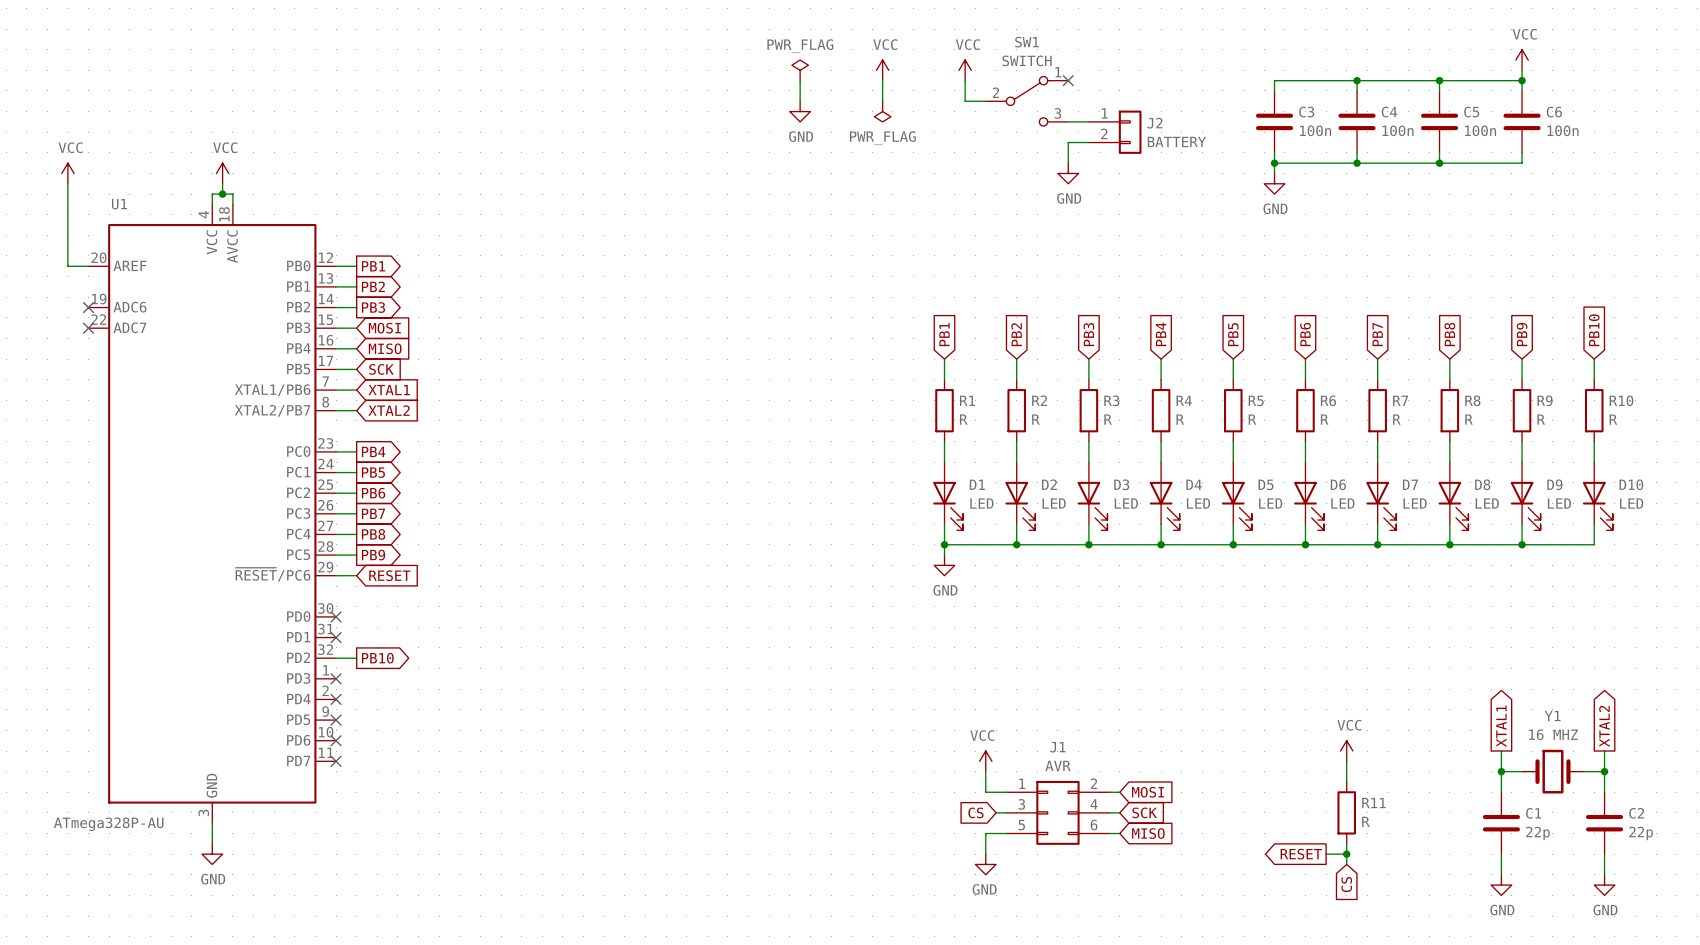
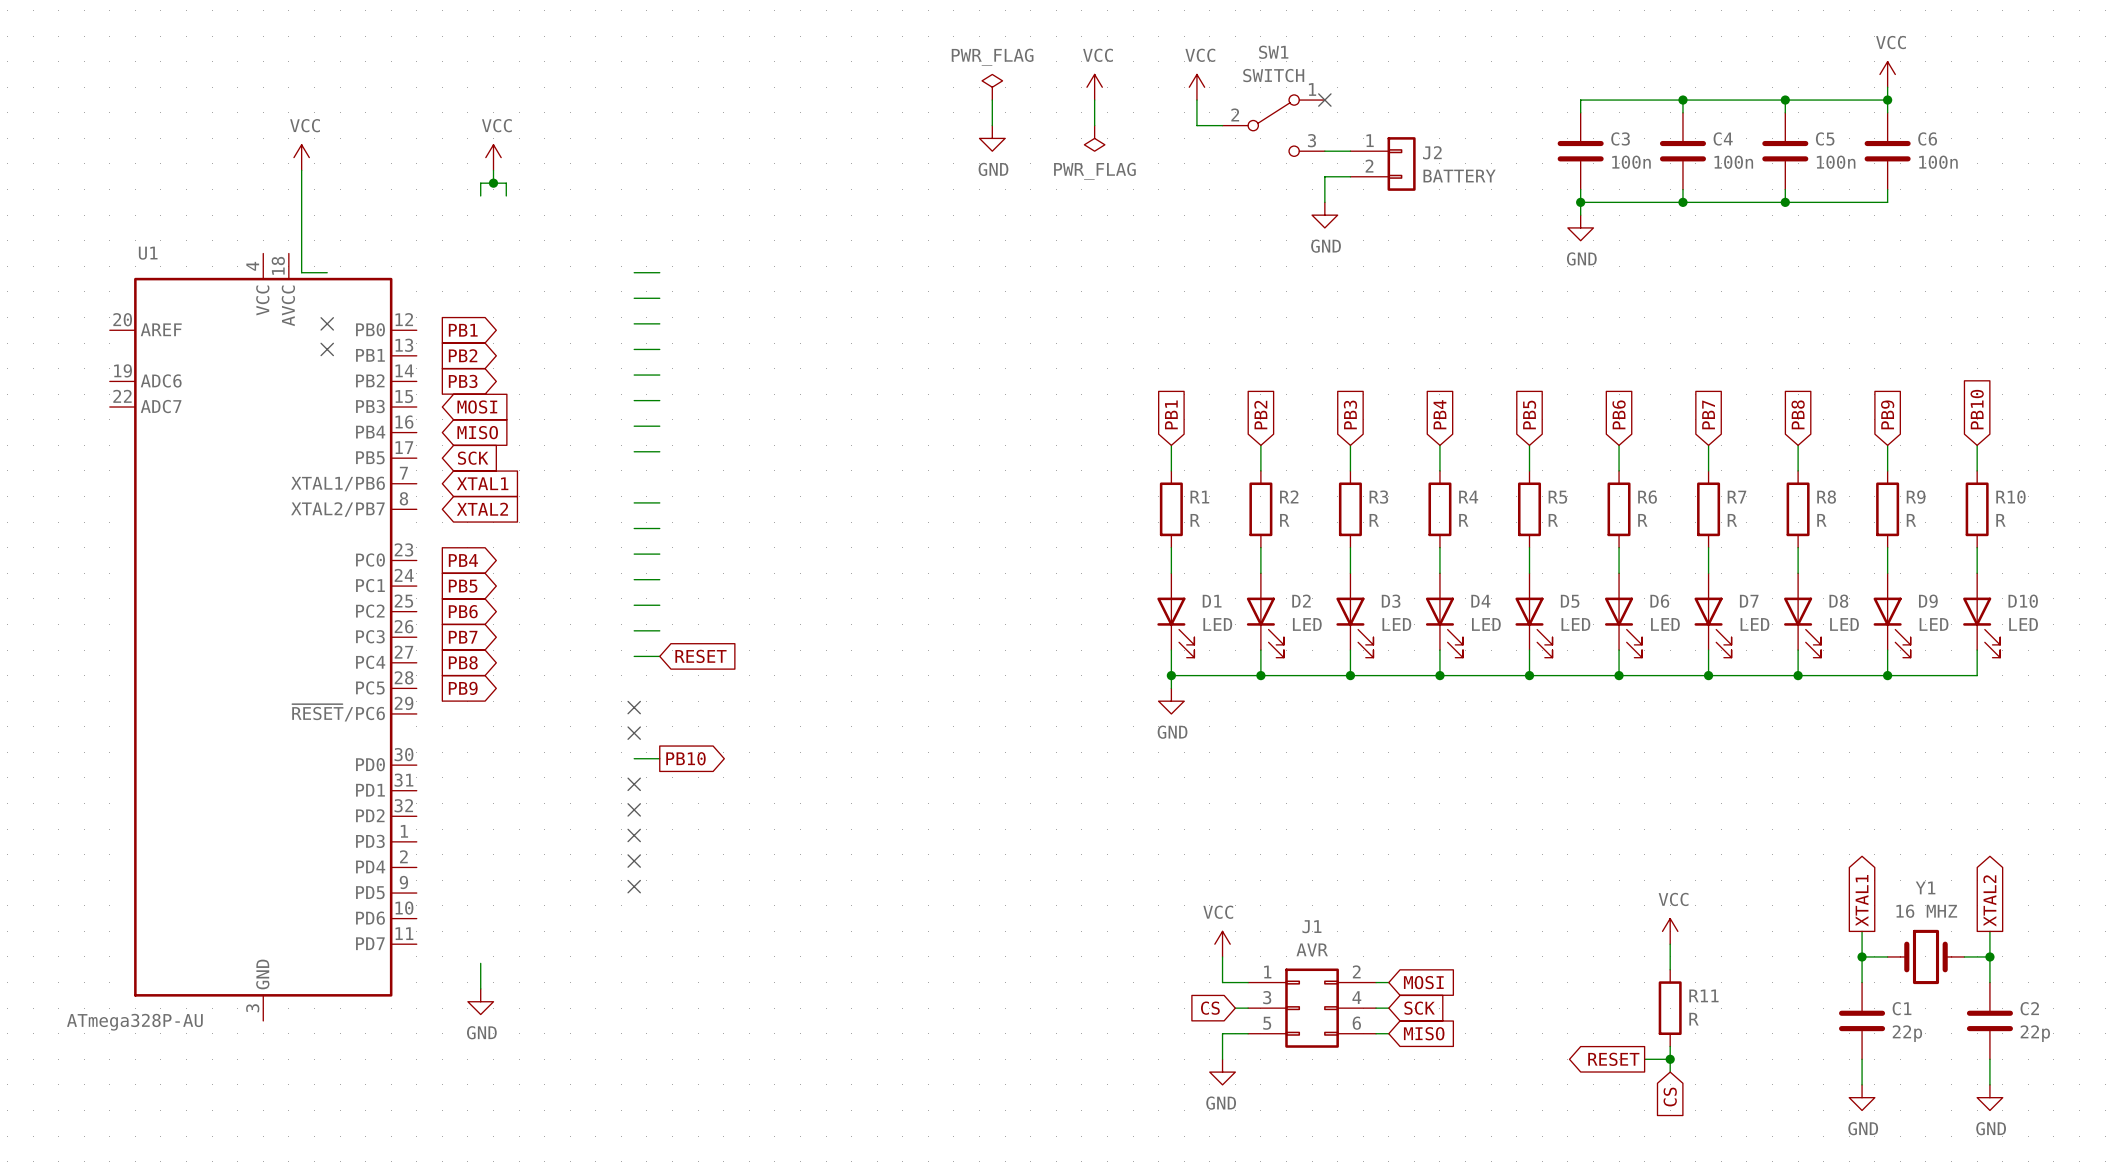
power symbol: none -> VCC (493, 157)
junction: none -> (493, 183)
power symbol: VCC (67, 173) -> none
power symbol position: VCC (222, 173) -> VCC (301, 157)
wire: (67, 183) (67, 266) (88, 266) -> (301, 170) (301, 272) (327, 272)
wire: (222, 183) (222, 194) -> (493, 170) (493, 183)
junction: (222, 194) -> none
wire: (212, 204) (212, 194) (232, 194) (232, 204) -> (480, 195) (480, 183) (506, 183) (506, 195)
no-connect mark: none -> (327, 323)
wire: (336, 266) (356, 266) -> (634, 272) (659, 272)
no-connect mark: none -> (327, 349)
wire: (336, 286) (356, 286) -> (634, 298) (659, 298)
no-connect mark: (88, 307) -> none
wire: (336, 307) (356, 307) -> (634, 323) (659, 323)
no-connect mark: (88, 328) -> none
wire: (336, 328) (356, 328) -> (634, 349) (659, 349)
wire: (336, 348) (356, 348) -> (634, 375) (659, 375)
wire: (336, 369) (356, 369) -> (634, 400) (659, 400)
wire: (336, 390) (356, 390) -> (634, 426) (659, 426)
wire: (336, 410) (356, 410) -> (634, 451) (659, 451)
wire: (336, 451) (356, 451) -> (634, 502) (659, 502)
wire: (336, 472) (356, 472) -> (634, 528) (659, 528)
wire: (336, 493) (356, 493) -> (634, 554) (659, 554)
wire: (336, 513) (356, 513) -> (634, 579) (659, 579)
wire: (336, 534) (356, 534) -> (634, 605) (659, 605)
wire: (336, 555) (356, 555) -> (634, 630) (659, 630)
no-connect mark: none -> (634, 707)
wire: (336, 575) (356, 575) -> (634, 656) (659, 656)
global label position: RESET (389, 575) -> RESET (700, 656)
no-connect mark: none -> (634, 733)
no-connect mark: (336, 616) -> none
no-connect mark: none -> (634, 784)
no-connect mark: (336, 637) -> none
no-connect mark: none -> (634, 809)
wire: (336, 658) (356, 658) -> (634, 758) (659, 758)
global label position: PB10 (377, 658) -> PB10 (685, 758)
no-connect mark: none -> (634, 835)
no-connect mark: (336, 678) -> none
no-connect mark: none -> (634, 861)
no-connect mark: (336, 699) -> none
no-connect mark: none -> (634, 886)
no-connect mark: (336, 720) -> none
no-connect mark: (336, 740) -> none
no-connect mark: (336, 761) -> none
wire: (212, 823) (212, 843) -> (480, 963) (480, 988)
power symbol position: GND (212, 854) -> GND (480, 1001)

